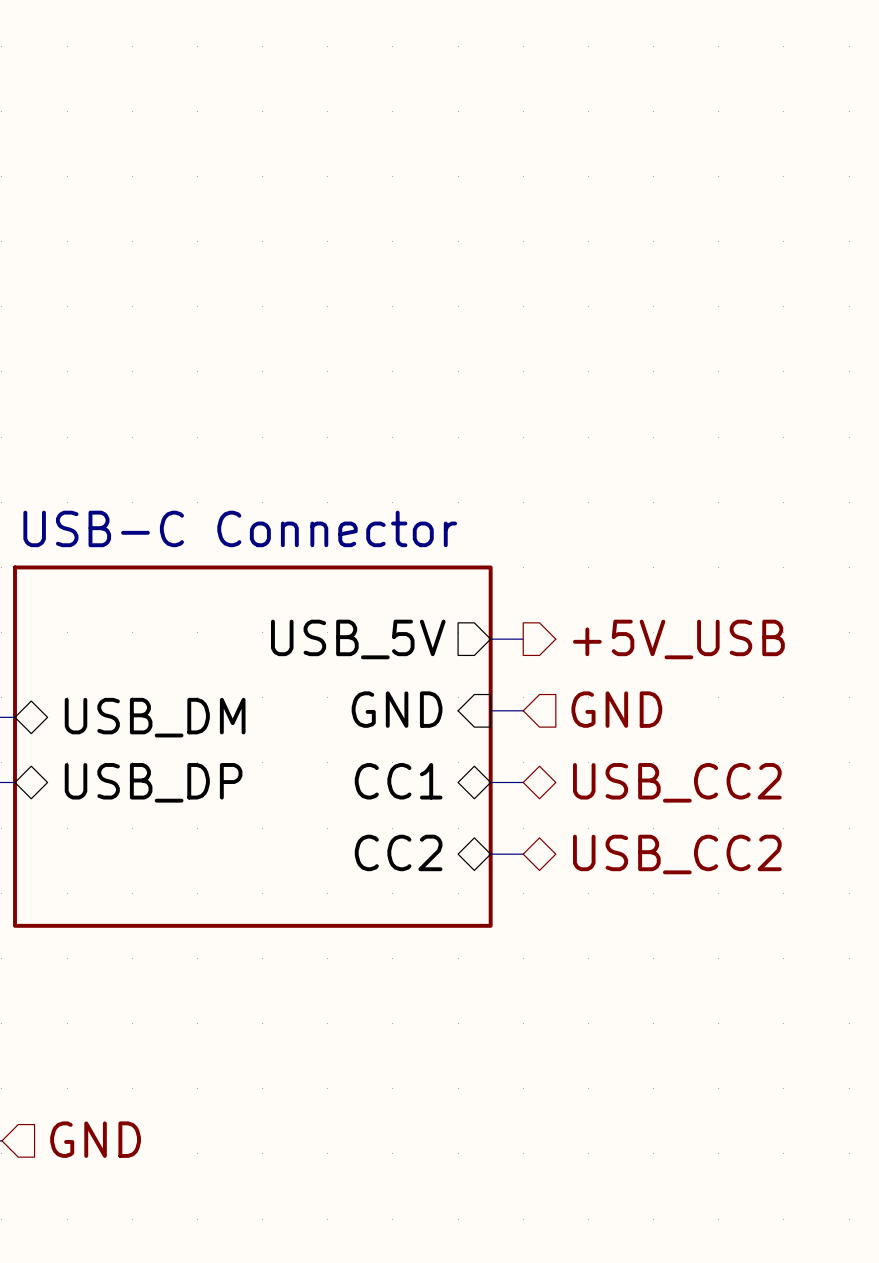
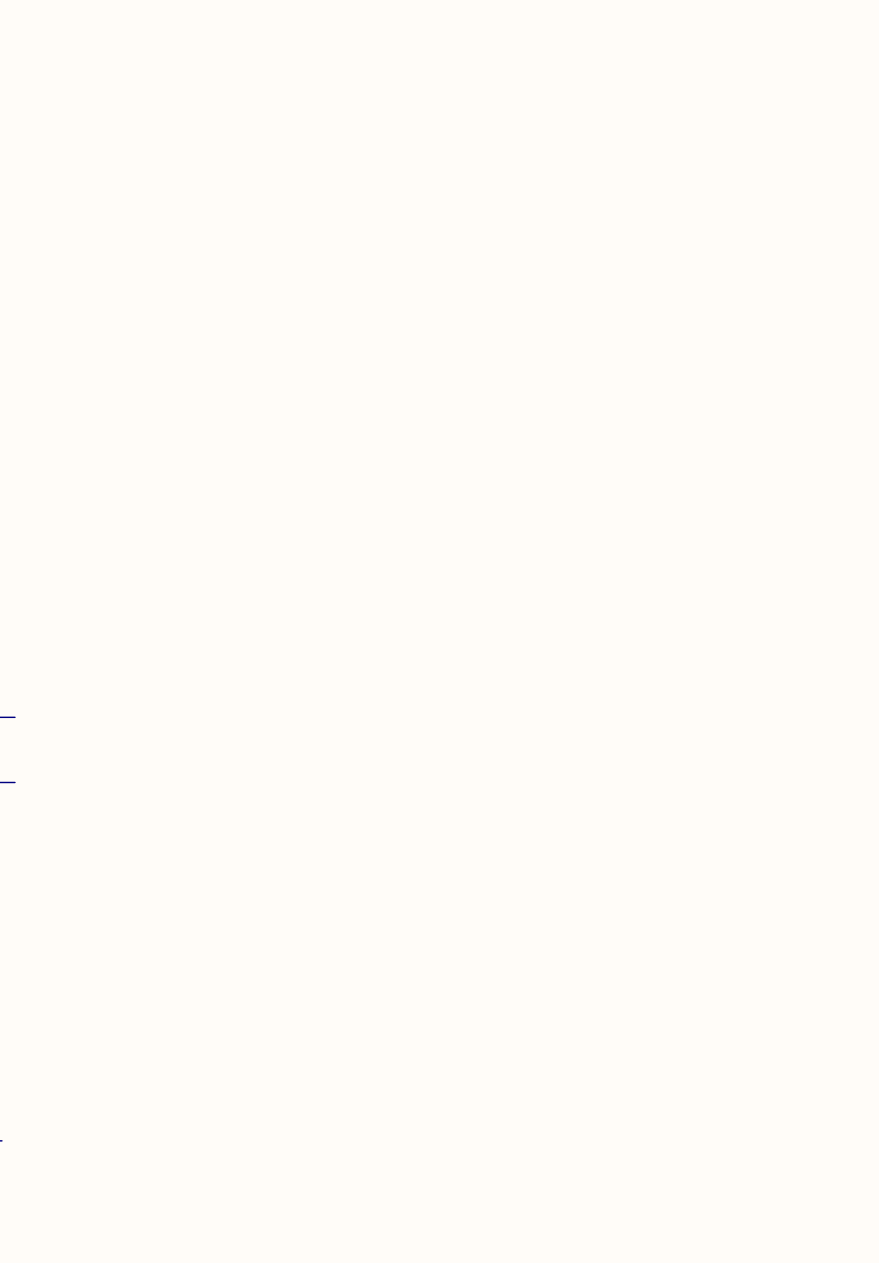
sheet pin: USB_5V (358, 639) -> none
wire: (490, 639) (523, 639) -> none
hierarchical label: +5V_USB (678, 639) -> none
sheet pin: GND (397, 709) -> none
hierarchical label: GND (616, 709) -> none
wire: (490, 710) (523, 710) -> none
sheet pin: USB_DM (155, 717) -> none
sheet USB-C Connector: (252, 746) -> none
sheet pin: CC1 (398, 781) -> none
sheet pin: USB_DP (153, 782) -> none
wire: (490, 782) (523, 782) -> none
hierarchical label: USB_CC2 (677, 782) -> none
sheet pin: CC2 (398, 852) -> none
wire: (490, 854) (523, 854) -> none
hierarchical label: USB_CC2 (677, 854) -> none
hierarchical label: GND (95, 1139) -> none

